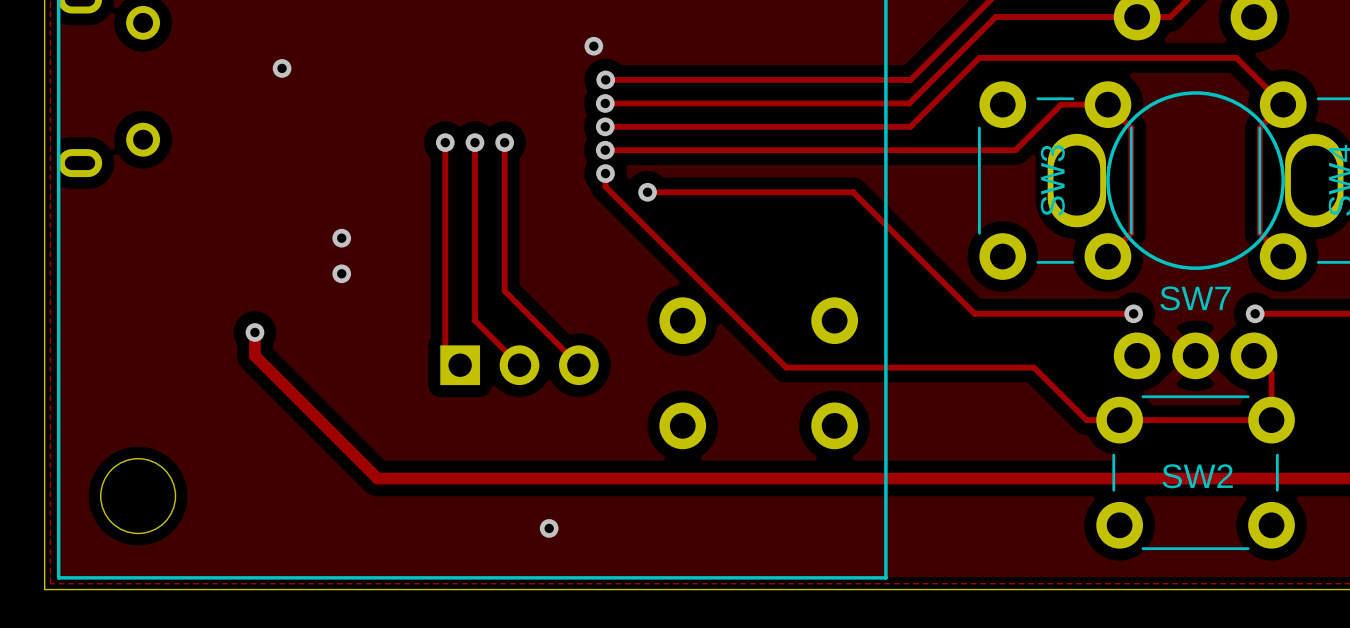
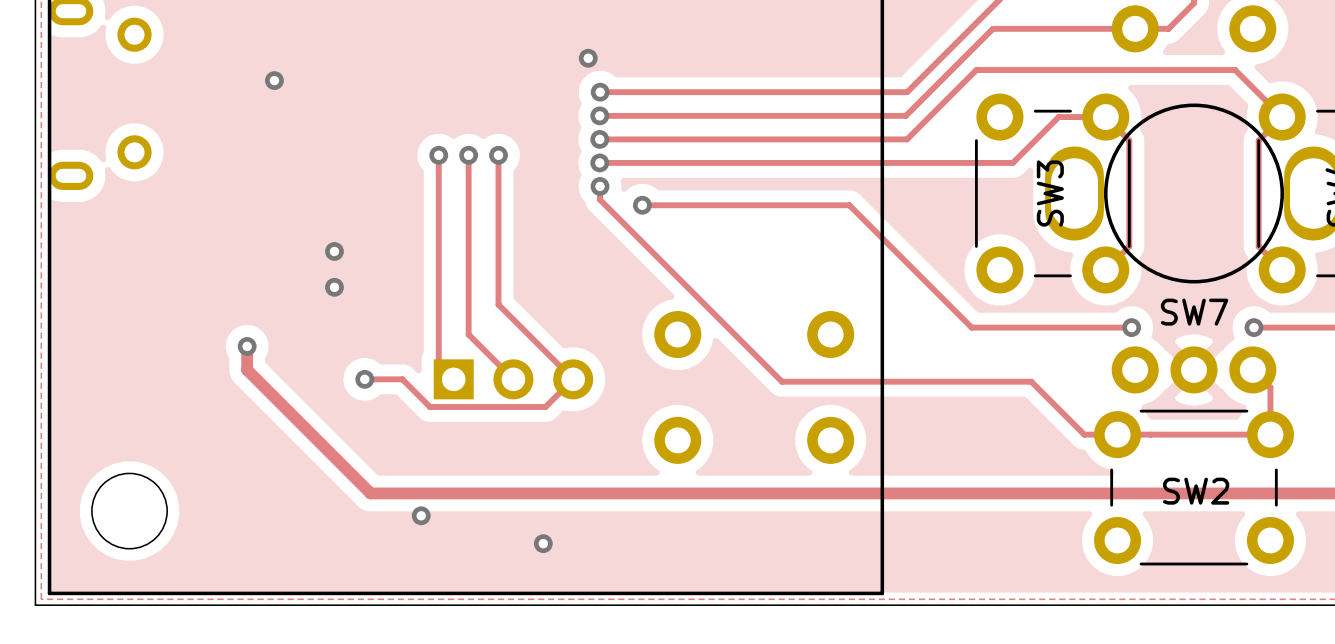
track: none -> (364, 379) (402, 379) (430, 406) (545, 406) (573, 379)
via: none -> (364, 379)
via: none -> (421, 515)

